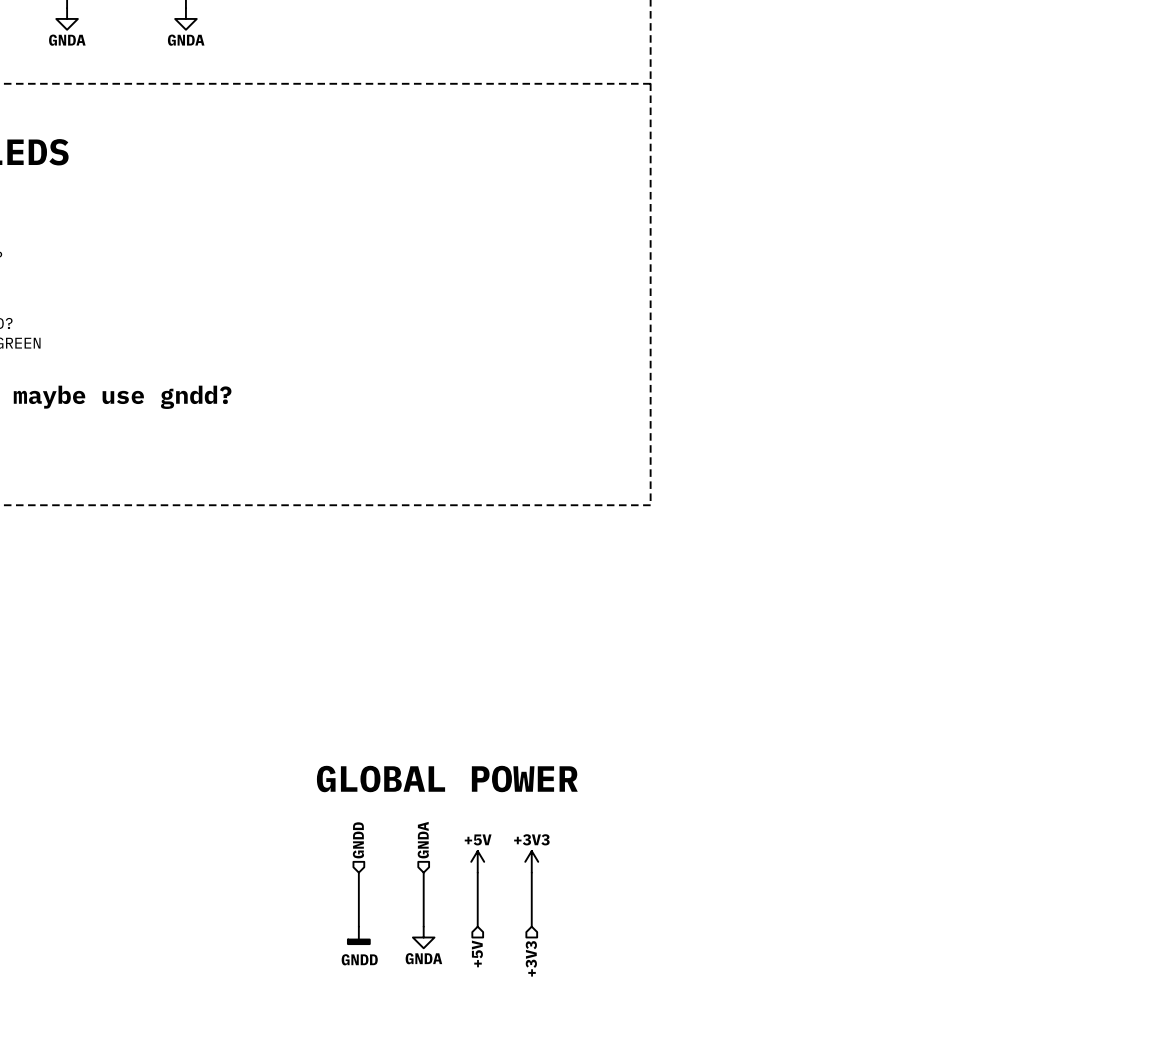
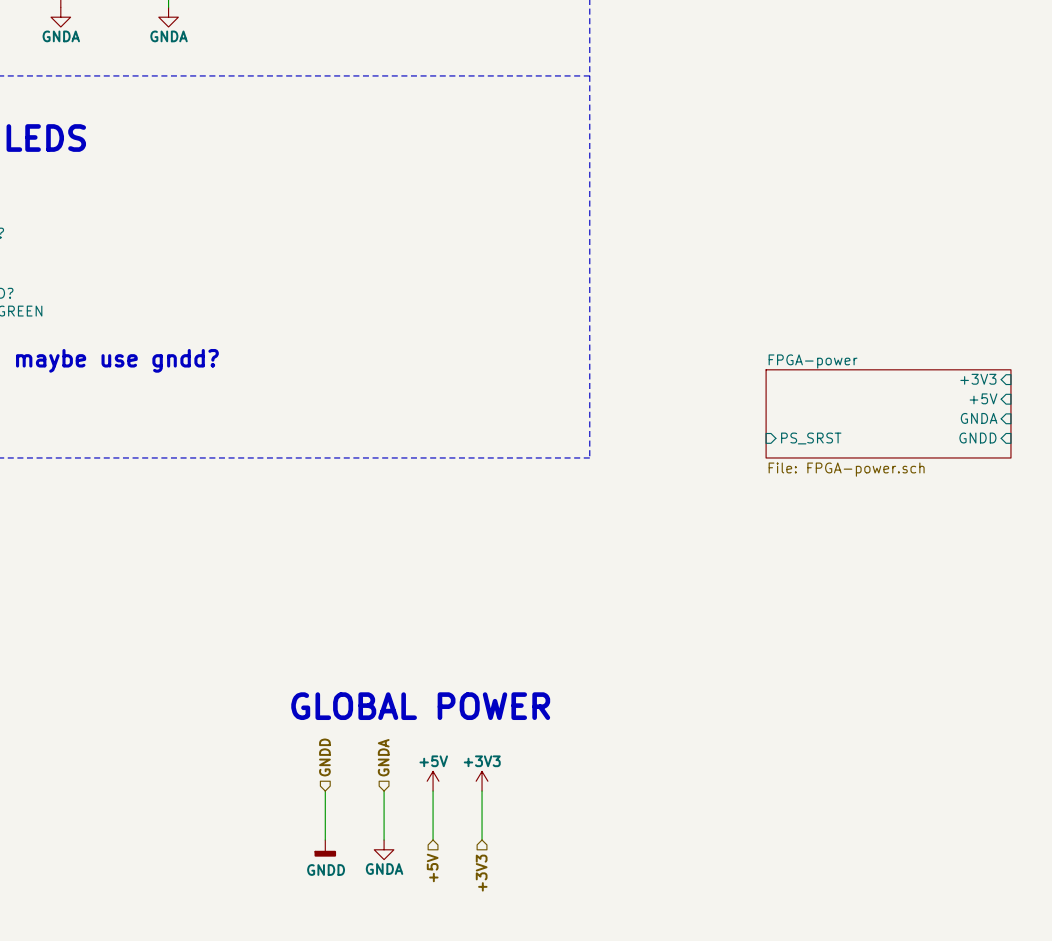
sheet pin: none -> +3V3 (978, 379)
sheet pin: none -> +5V (983, 398)
sheet FPGA-power: none -> File: FPGA-power.sch (888, 413)
sheet pin: none -> GNDA (979, 418)
sheet pin: none -> GNDD (977, 438)
sheet pin: none -> PS_SRST (811, 438)

